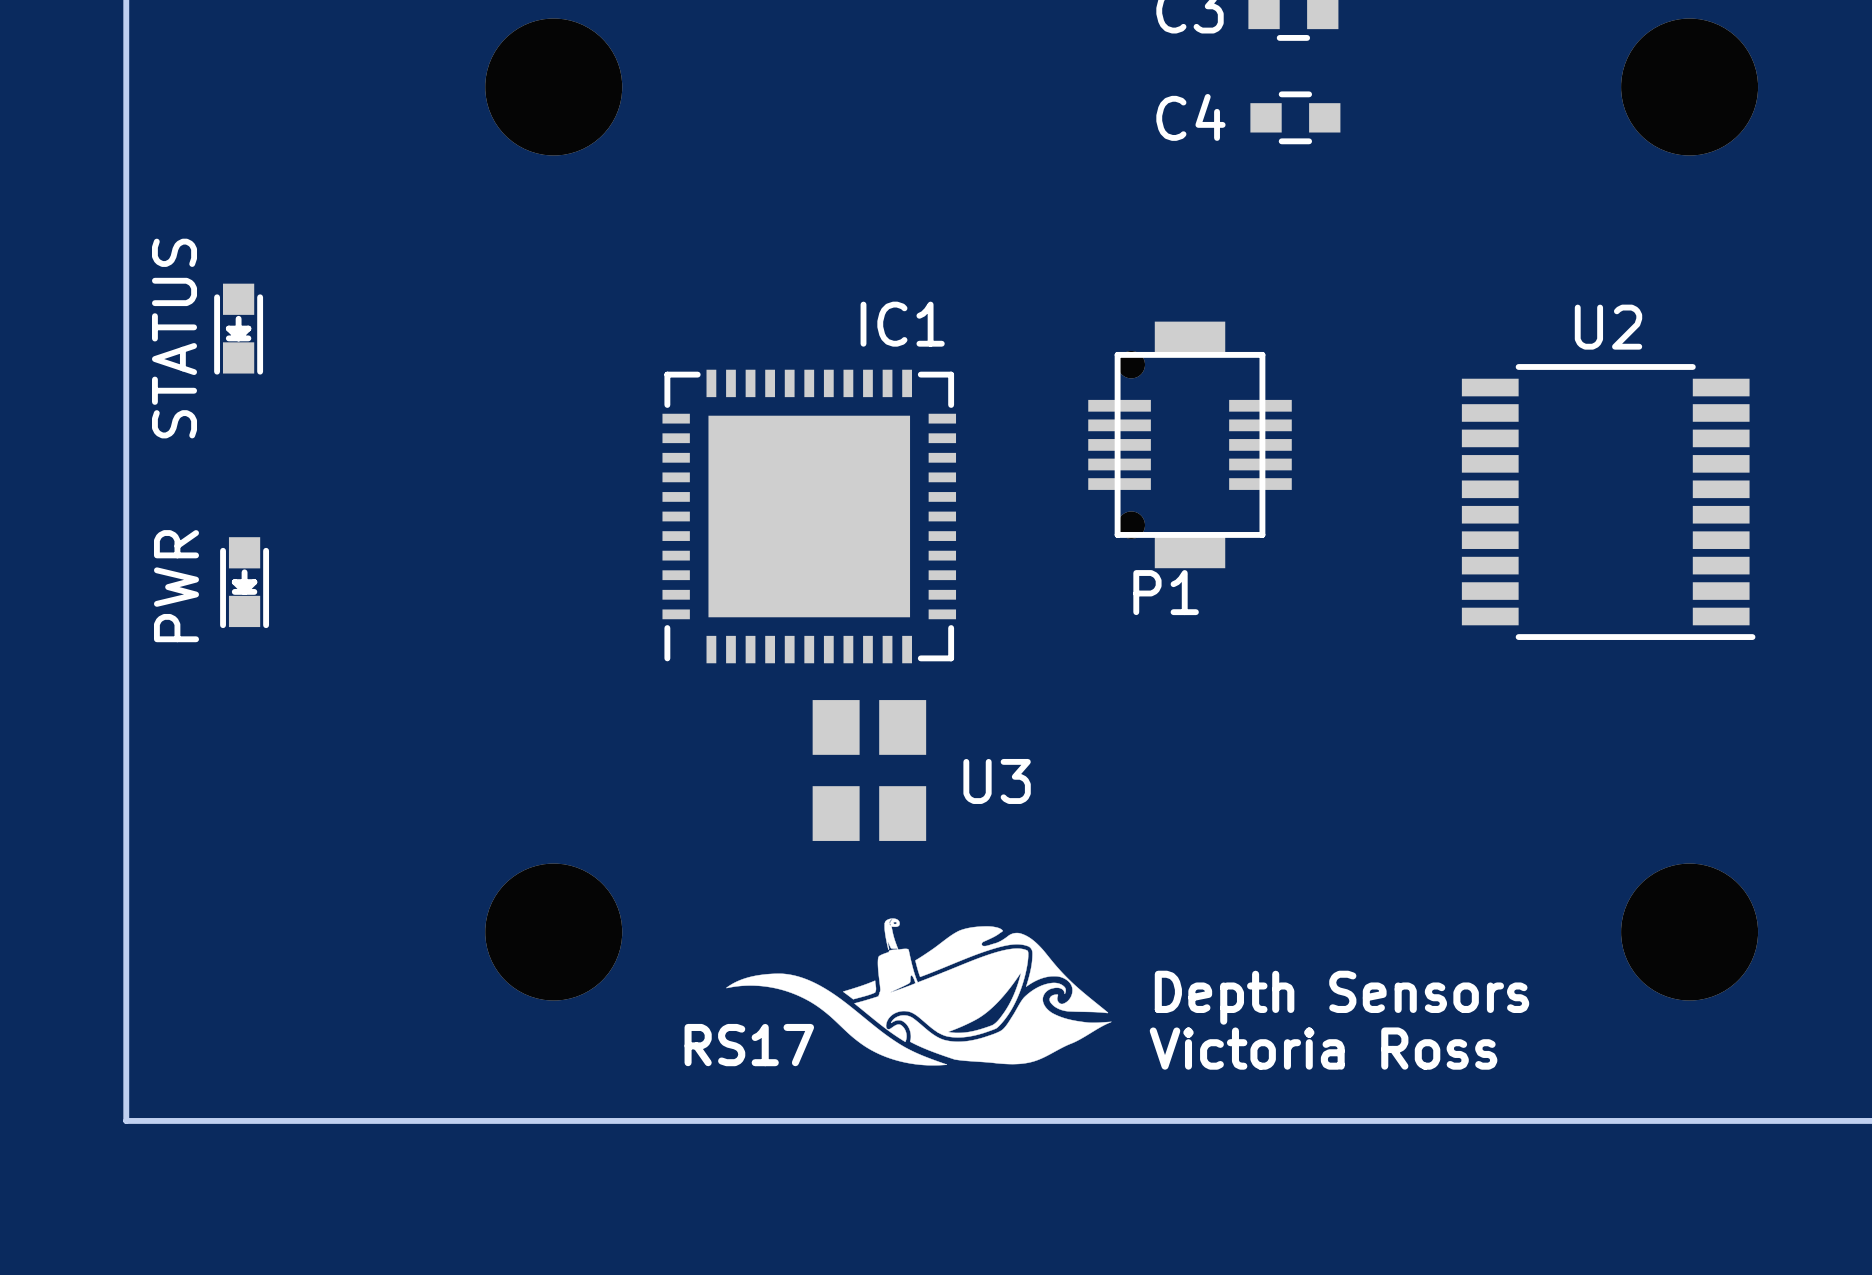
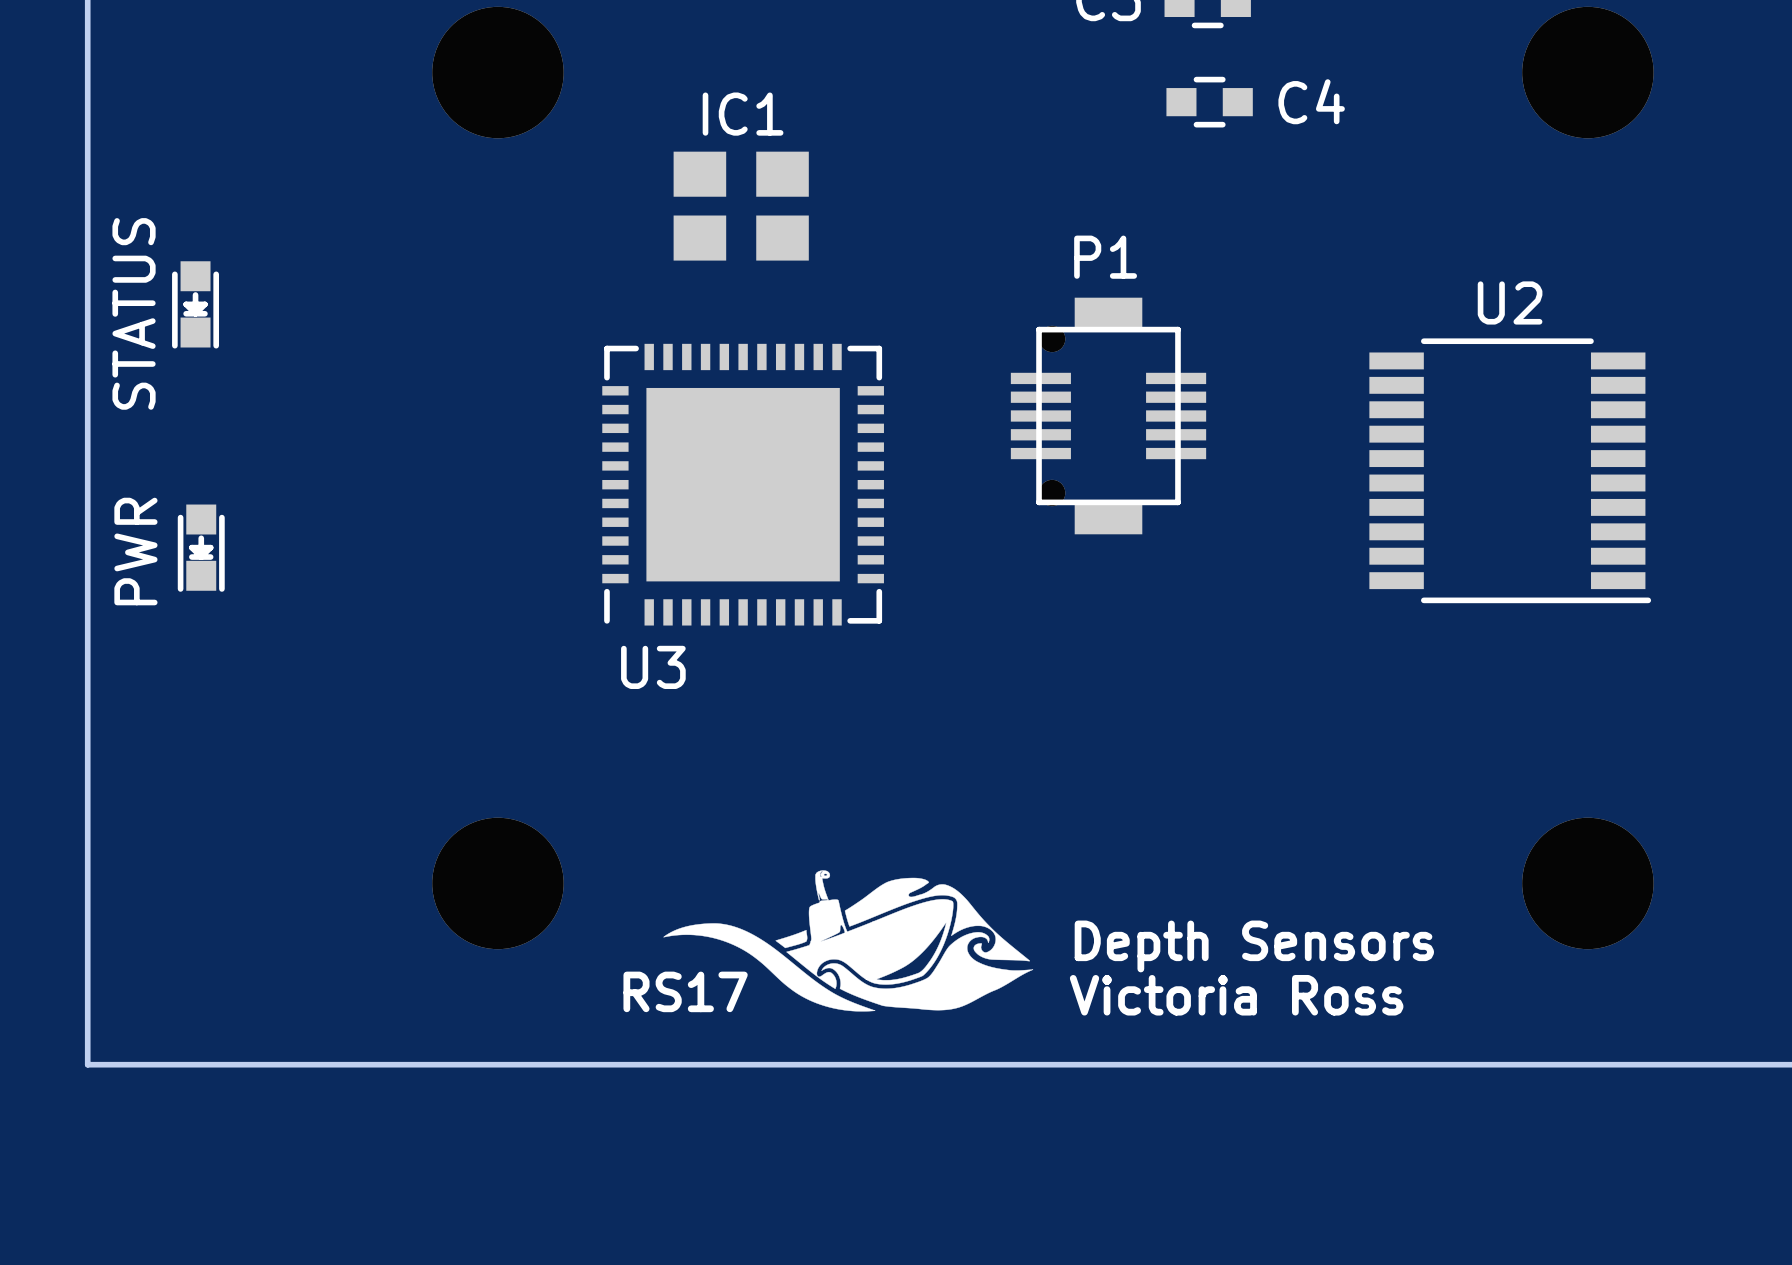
C4 name position: C4 (1190, 117) -> C4 (1311, 101)
IC1 name position: IC1 (902, 324) -> IC1 (743, 114)
P1 name position: P1 (1166, 592) -> P1 (1105, 257)
U3 rotation: 0° (869, 770) -> 90° clockwise (741, 206)
U3 position: (869, 770) -> (741, 206)
U3 name position: U3 (997, 781) -> U3 (653, 667)

